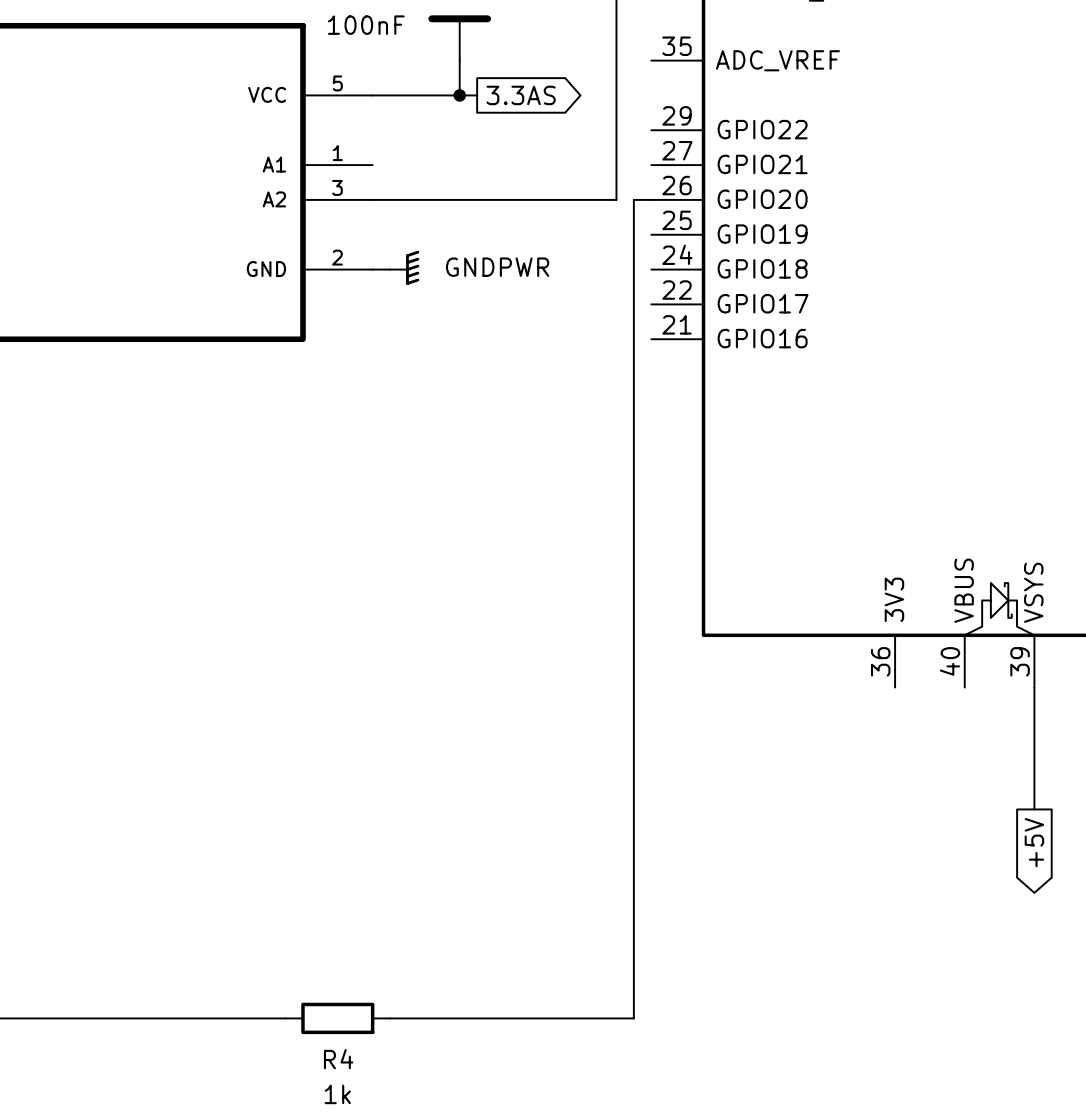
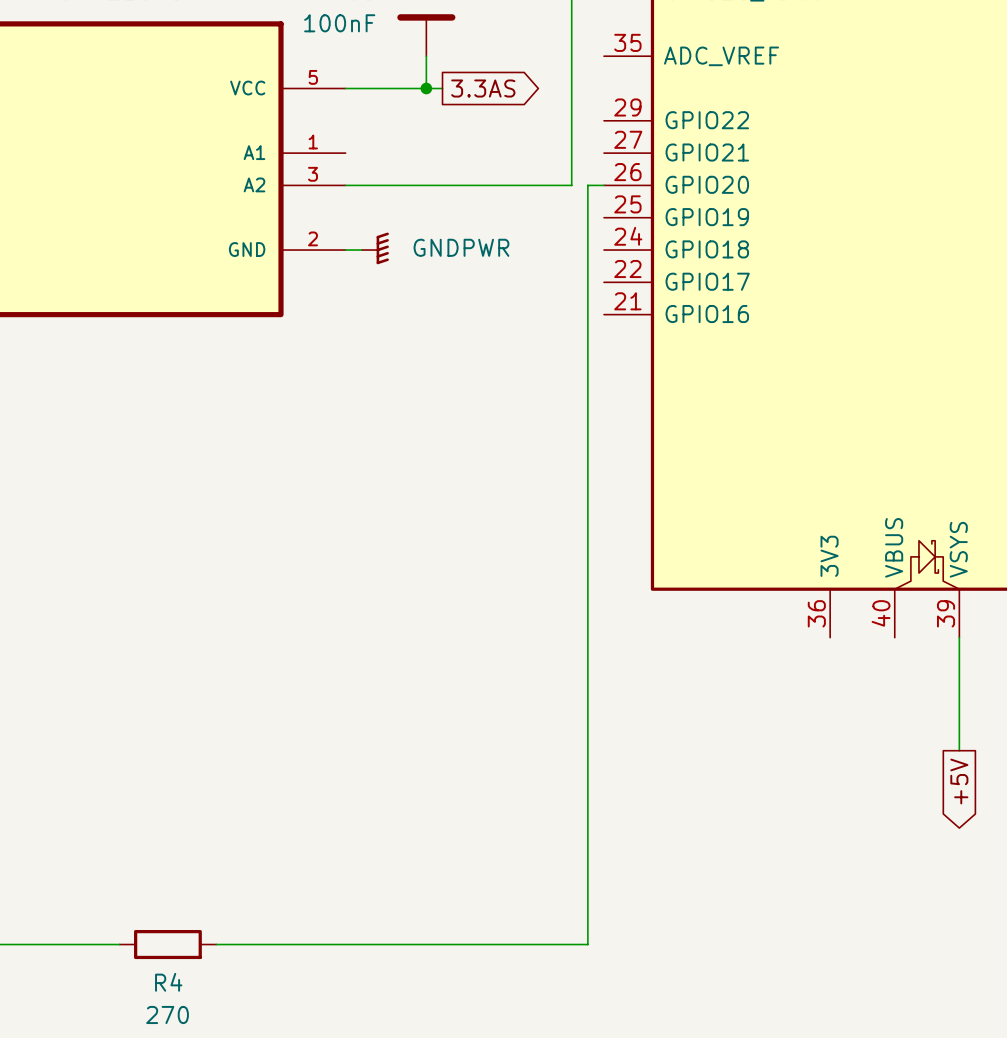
wire: (128, 1018) (233, 1018) -> (264, 944) (361, 944)
R4 position: (337, 1018) -> (167, 944)
R4 value: 1k (337, 1094) -> 270 (167, 1014)

